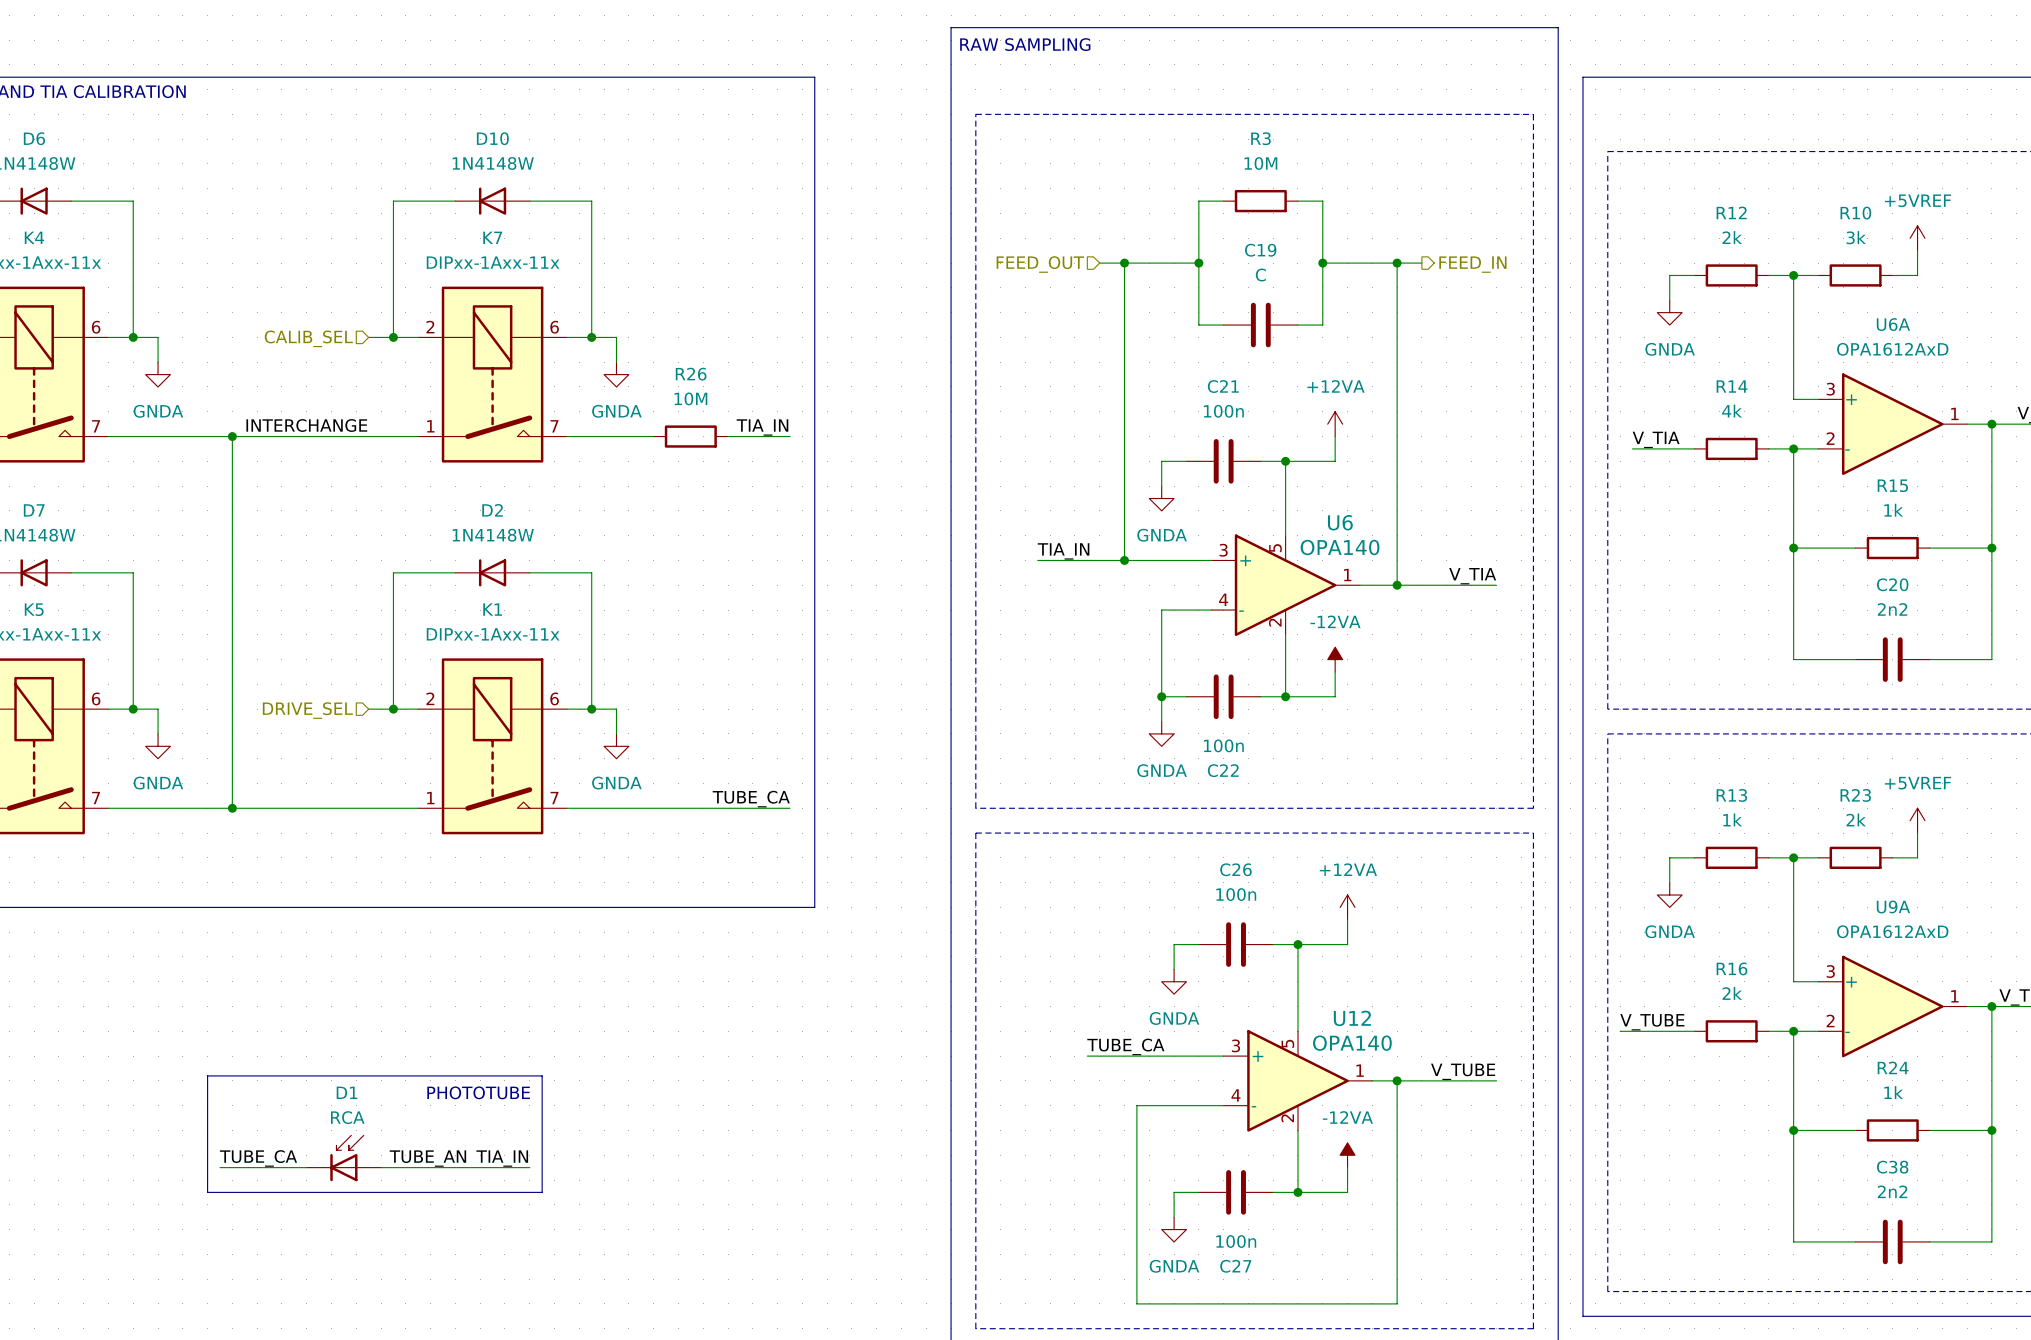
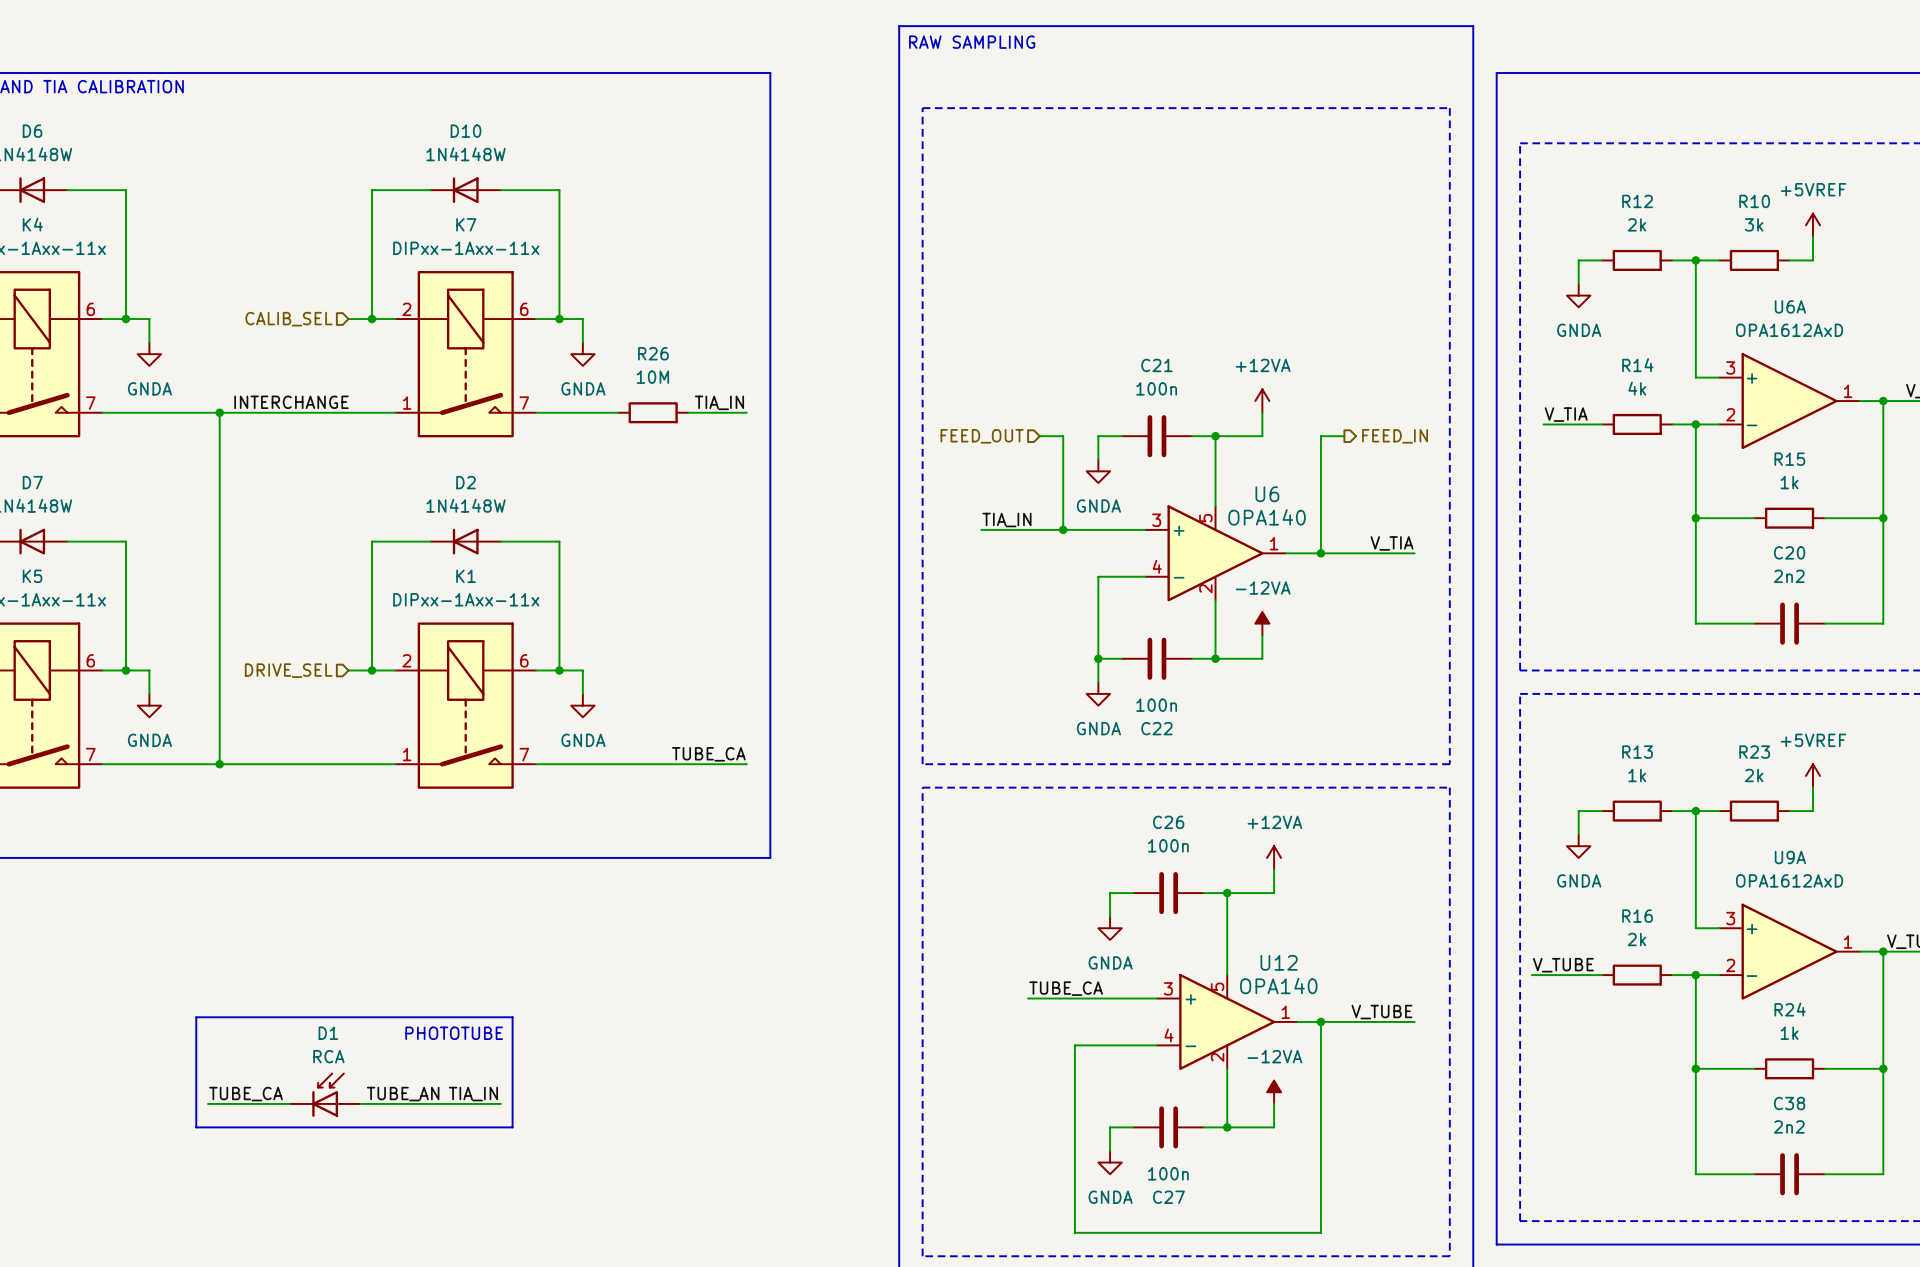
wire: (1223, 201) (1198, 201) (1198, 325) (1223, 325) -> none
R3: 10M (1260, 201) -> none
wire: (1297, 201) (1322, 201) (1322, 325) (1297, 325) -> none
wire: (1099, 263) (1198, 263) -> none
wire: (1124, 263) (1124, 461) -> (1039, 436) (1063, 436)
junction: (1124, 263) -> none
junction: (1198, 263) -> none
wire: (1322, 263) (1421, 263) -> none
junction: (1322, 263) -> none
wire: (1397, 263) (1397, 461) -> (1344, 436) (1320, 436)
junction: (1397, 263) -> none
hierarchical label position: FEED_OUT (1040, 264) -> FEED_OUT (982, 436)
hierarchical label position: FEED_IN (1472, 264) -> FEED_IN (1395, 436)
C19: C (1260, 325) -> none

